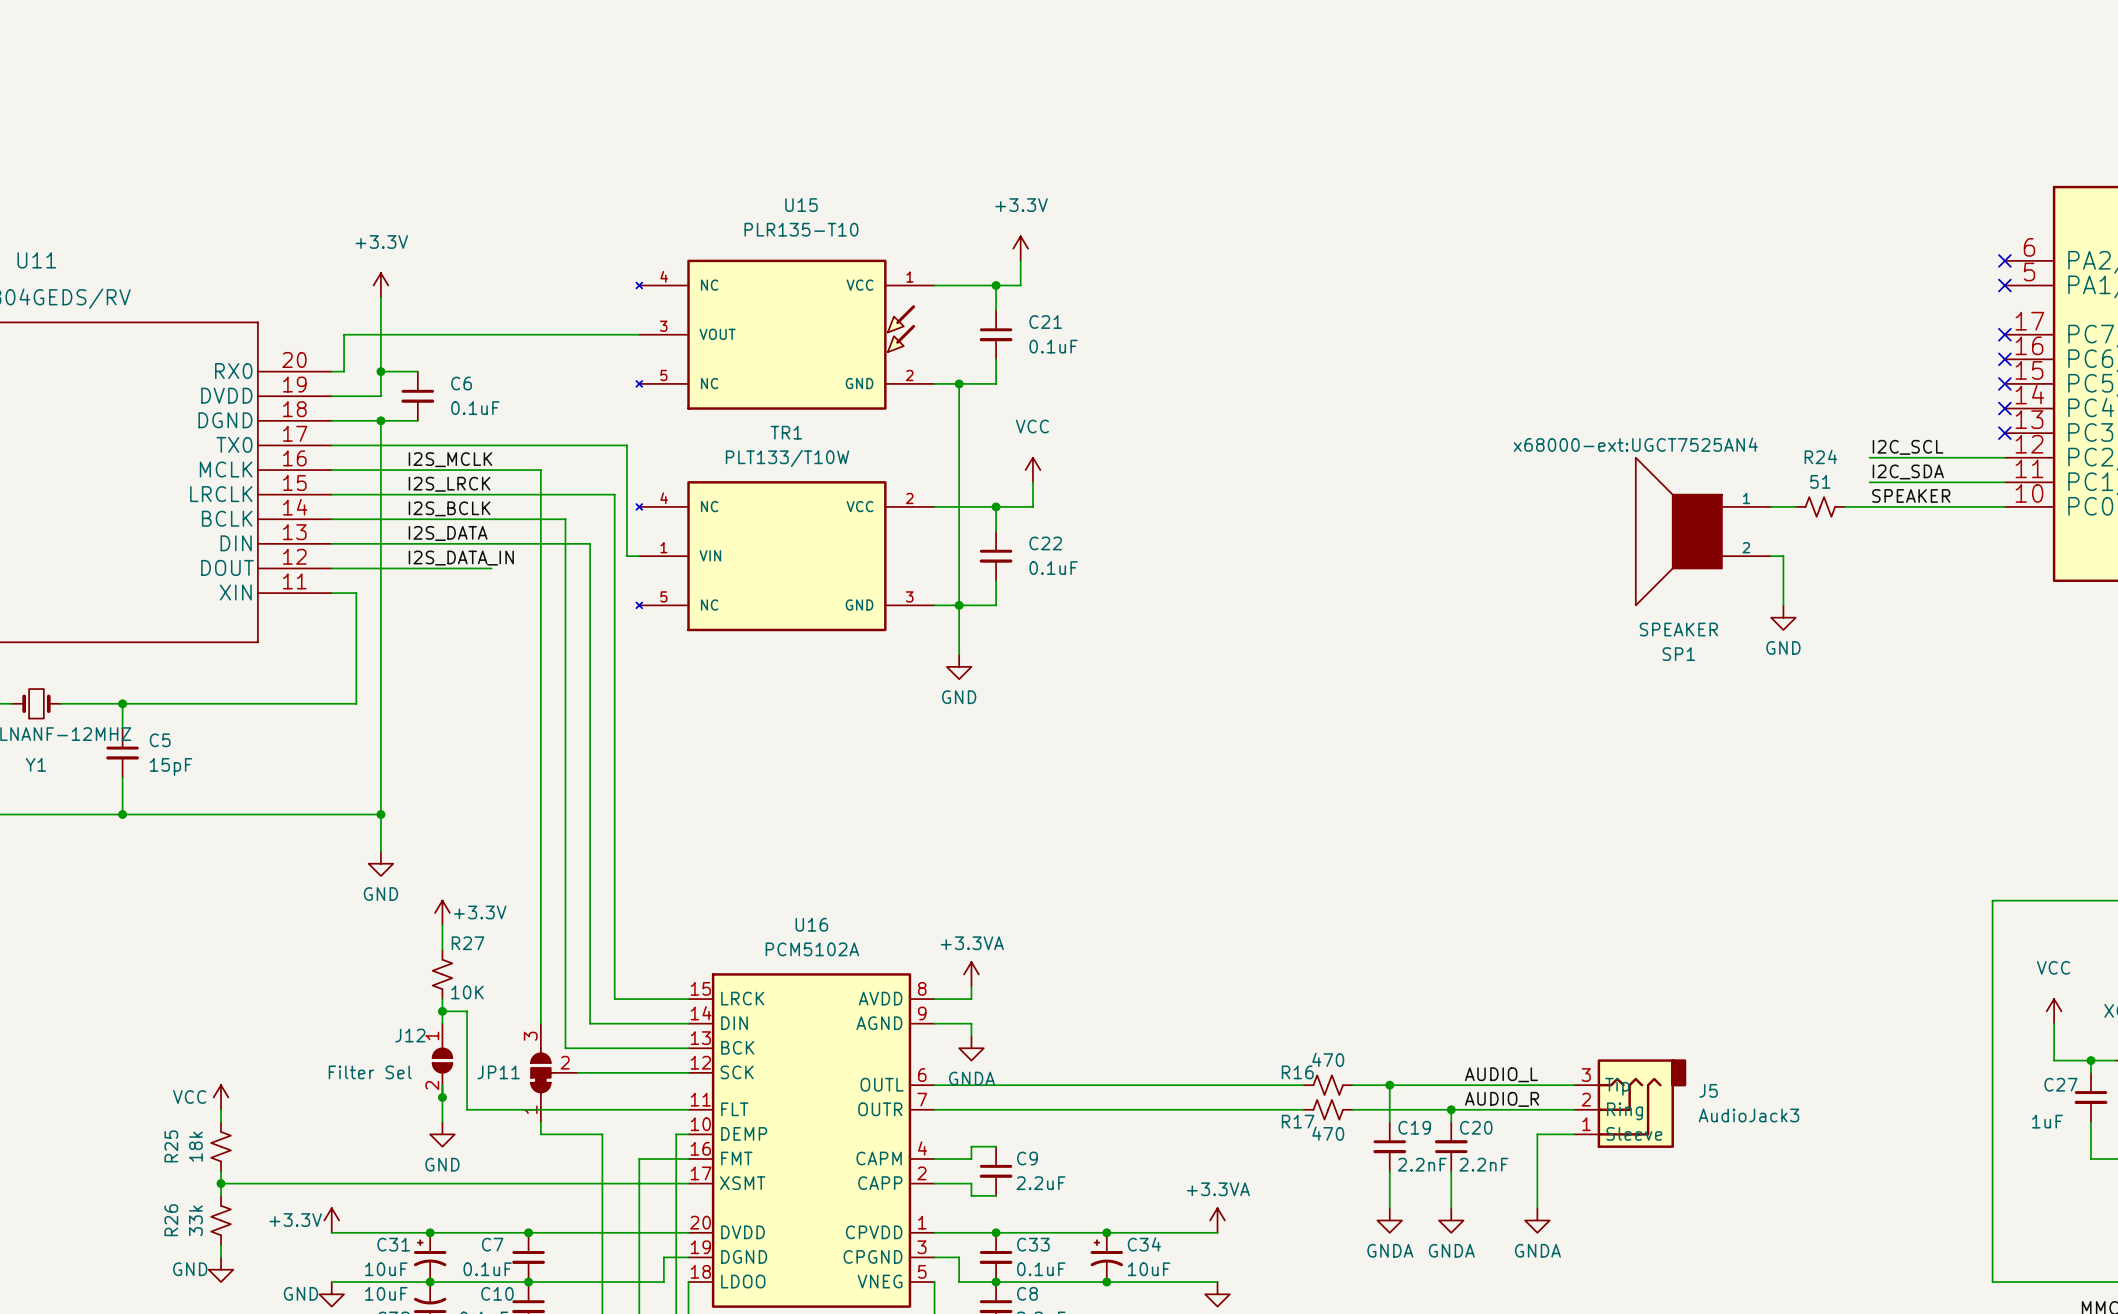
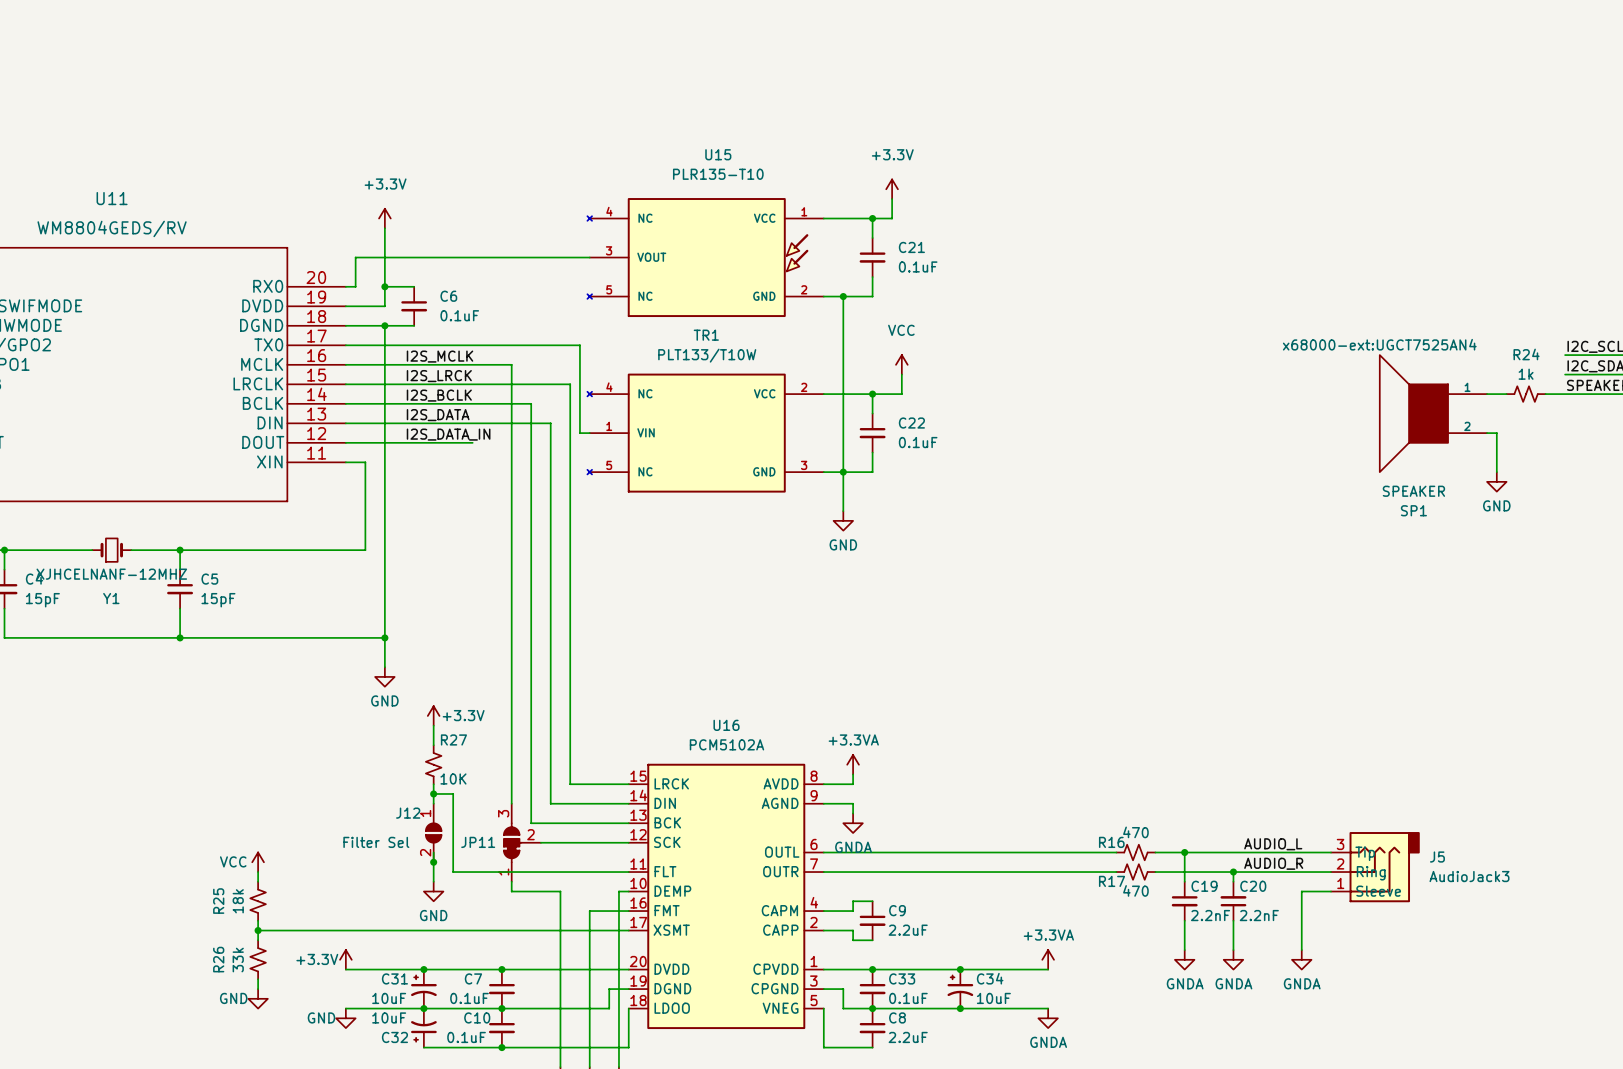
R24 value: 51 (1820, 481) -> 1k (1526, 374)

